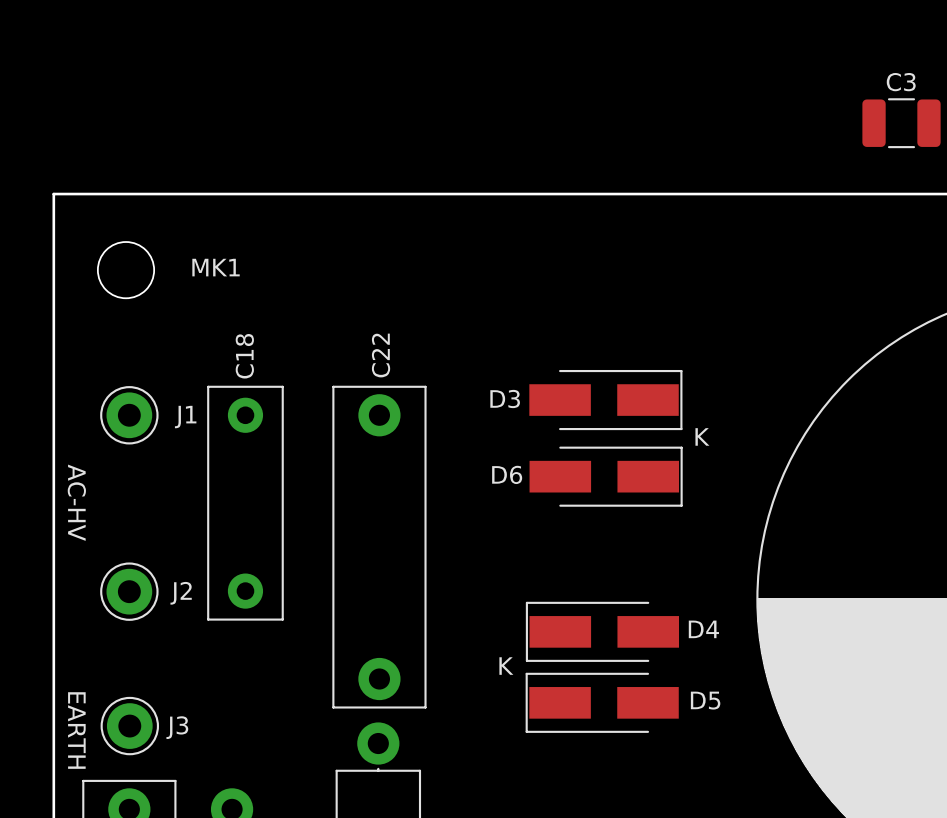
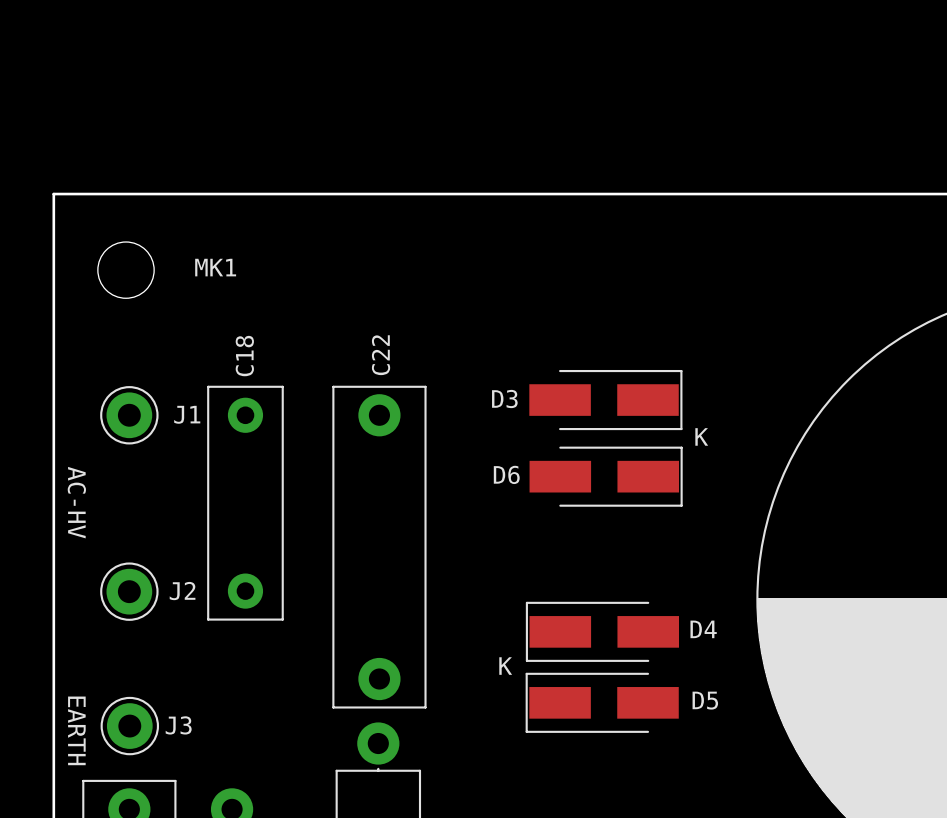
C3: (901, 123) -> none

